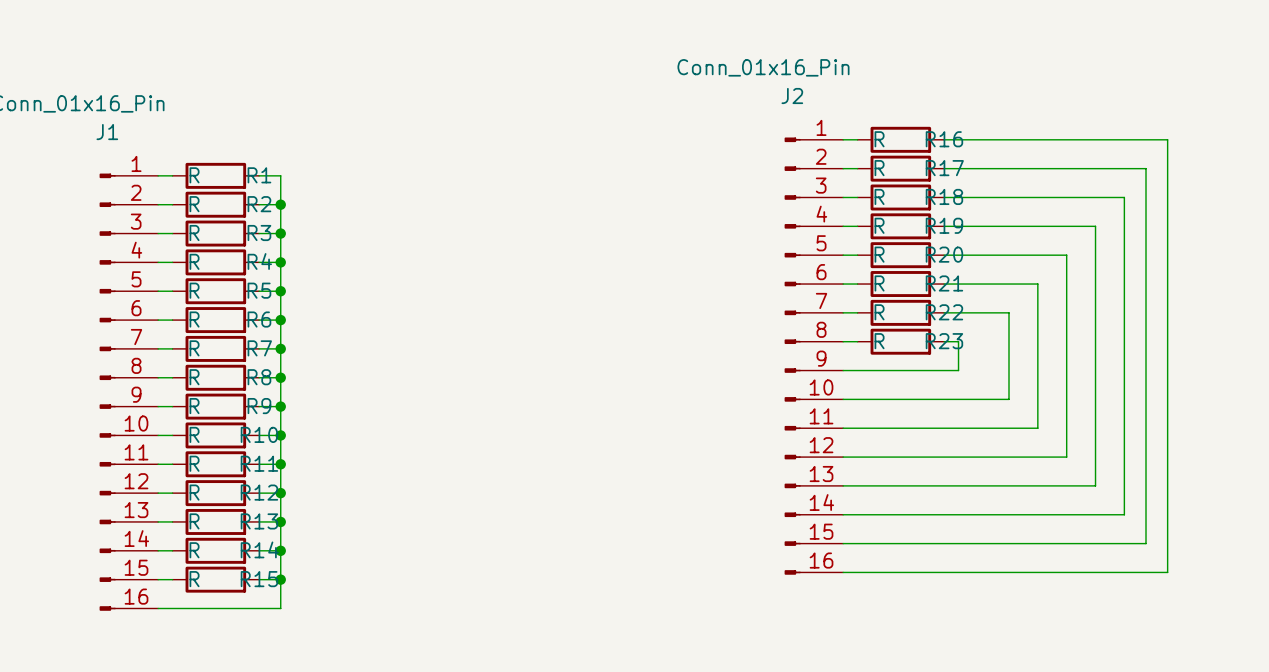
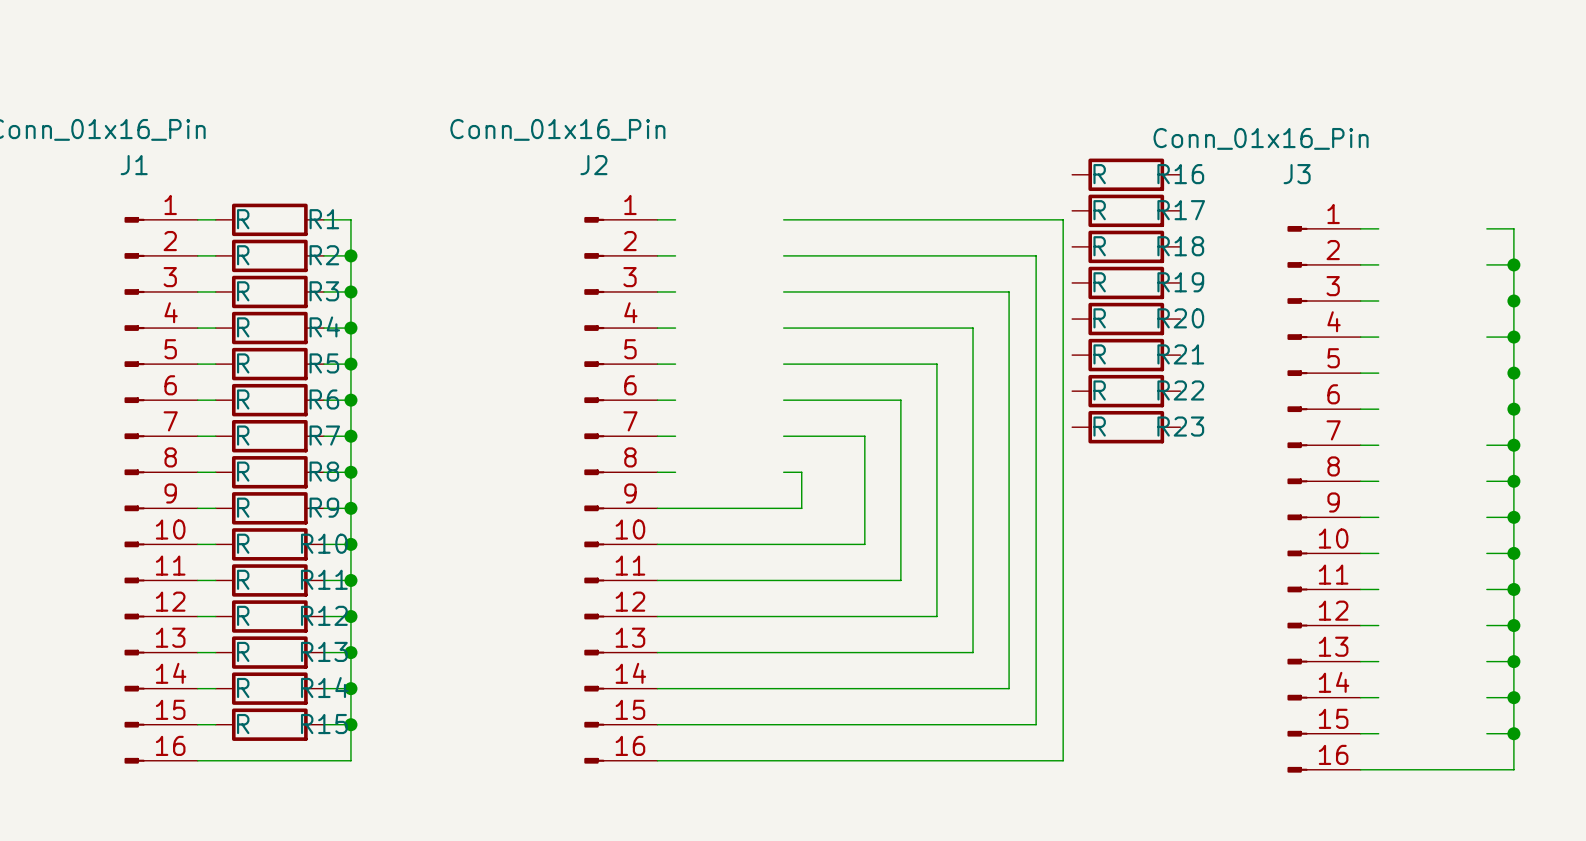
wire: (843, 139) (857, 139) -> (1360, 228) (1378, 228)
wire: (944, 139) (1167, 139) (1167, 572) (843, 572) -> none
wire: (843, 168) (857, 168) -> (1360, 264) (1378, 264)
wire: (944, 168) (1146, 168) (1146, 543) (843, 543) -> none
wire: none -> (657, 219) (675, 219)
wire: none -> (783, 219) (1063, 219) (1063, 760) (657, 760)
wire: none -> (1486, 228) (1513, 228) (1513, 769) (1360, 769)
wire: (843, 197) (857, 197) -> (1360, 301) (1378, 301)
wire: (944, 197) (1124, 197) (1124, 514) (843, 514) -> none
wire: none -> (657, 255) (675, 255)
wire: none -> (783, 255) (1036, 255) (1036, 724) (657, 724)
wire: none -> (1486, 264) (1513, 264)
junction: none -> (1513, 264)
wire: (843, 226) (857, 226) -> (1360, 337) (1378, 337)
wire: (944, 226) (1095, 226) (1095, 485) (843, 485) -> none
wire: none -> (657, 291) (675, 291)
wire: none -> (783, 291) (1009, 291) (1009, 688) (657, 688)
junction: none -> (1513, 301)
wire: (843, 255) (857, 255) -> (1360, 373) (1378, 373)
wire: (944, 255) (1066, 255) (1066, 457) (843, 457) -> none
wire: none -> (657, 328) (675, 328)
wire: none -> (783, 328) (973, 328) (973, 652) (657, 652)
wire: none -> (1486, 337) (1513, 337)
junction: none -> (1513, 337)
wire: (843, 284) (857, 284) -> (1360, 409) (1378, 409)
wire: (944, 284) (1037, 284) (1037, 428) (843, 428) -> none
wire: none -> (657, 364) (675, 364)
wire: none -> (783, 364) (936, 364) (936, 616) (657, 616)
junction: none -> (1513, 373)
wire: (843, 312) (857, 312) -> (1360, 445) (1378, 445)
wire: (944, 312) (1009, 312) (1009, 399) (843, 399) -> none
wire: none -> (657, 400) (675, 400)
wire: none -> (783, 400) (900, 400) (900, 580) (657, 580)
junction: none -> (1513, 409)
wire: (843, 341) (857, 341) -> (1360, 481) (1378, 481)
wire: (944, 341) (958, 341) (958, 370) (843, 370) -> none
wire: none -> (657, 436) (675, 436)
wire: none -> (783, 436) (864, 436) (864, 544) (657, 544)
J2 position: (813, 356) -> (620, 490)
wire: none -> (1486, 445) (1513, 445)
junction: none -> (1513, 445)
wire: none -> (657, 472) (675, 472)
wire: none -> (783, 472) (801, 472) (801, 508) (657, 508)
wire: none -> (1486, 481) (1513, 481)
junction: none -> (1513, 481)
J3: none -> Conn_01x16_Pin (1324, 499)
wire: none -> (1360, 517) (1378, 517)
wire: none -> (1486, 517) (1513, 517)
junction: none -> (1513, 517)
wire: none -> (1360, 553) (1378, 553)
wire: none -> (1486, 553) (1513, 553)
junction: none -> (1513, 553)
wire: none -> (1360, 589) (1378, 589)
wire: none -> (1486, 589) (1513, 589)
junction: none -> (1513, 589)
wire: none -> (1360, 625) (1378, 625)
wire: none -> (1486, 625) (1513, 625)
junction: none -> (1513, 625)
wire: none -> (1360, 661) (1378, 661)
wire: none -> (1486, 661) (1513, 661)
junction: none -> (1513, 661)
wire: none -> (1360, 697) (1378, 697)
wire: none -> (1486, 697) (1513, 697)
junction: none -> (1513, 697)
wire: none -> (1360, 733) (1378, 733)
wire: none -> (1486, 733) (1513, 733)
junction: none -> (1513, 733)

